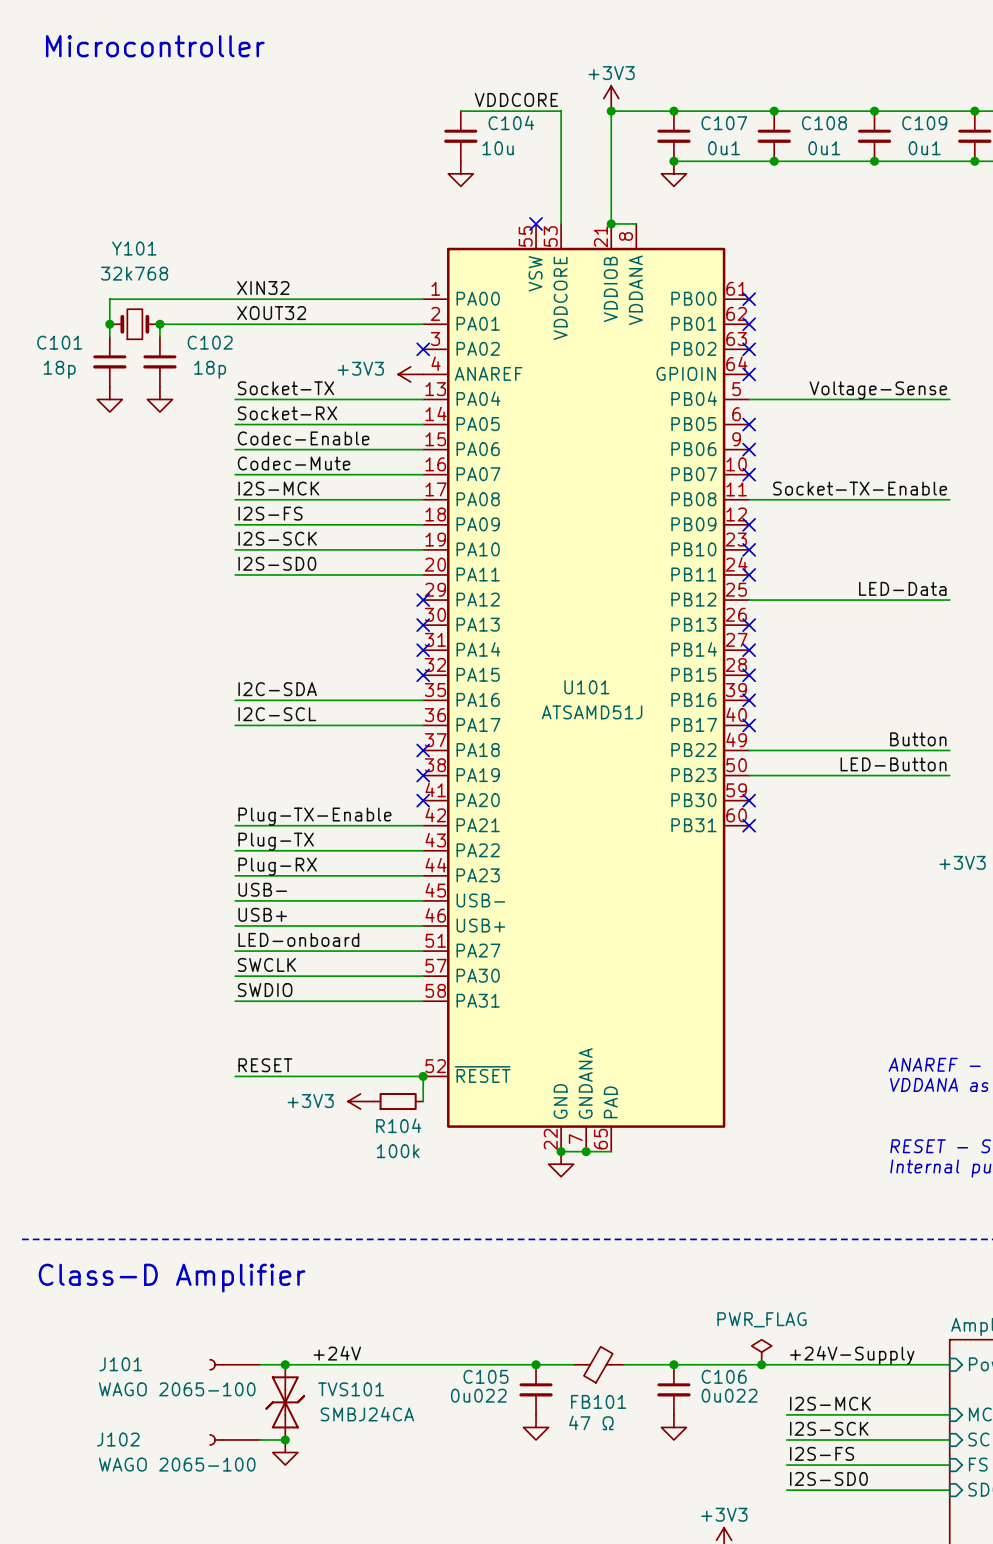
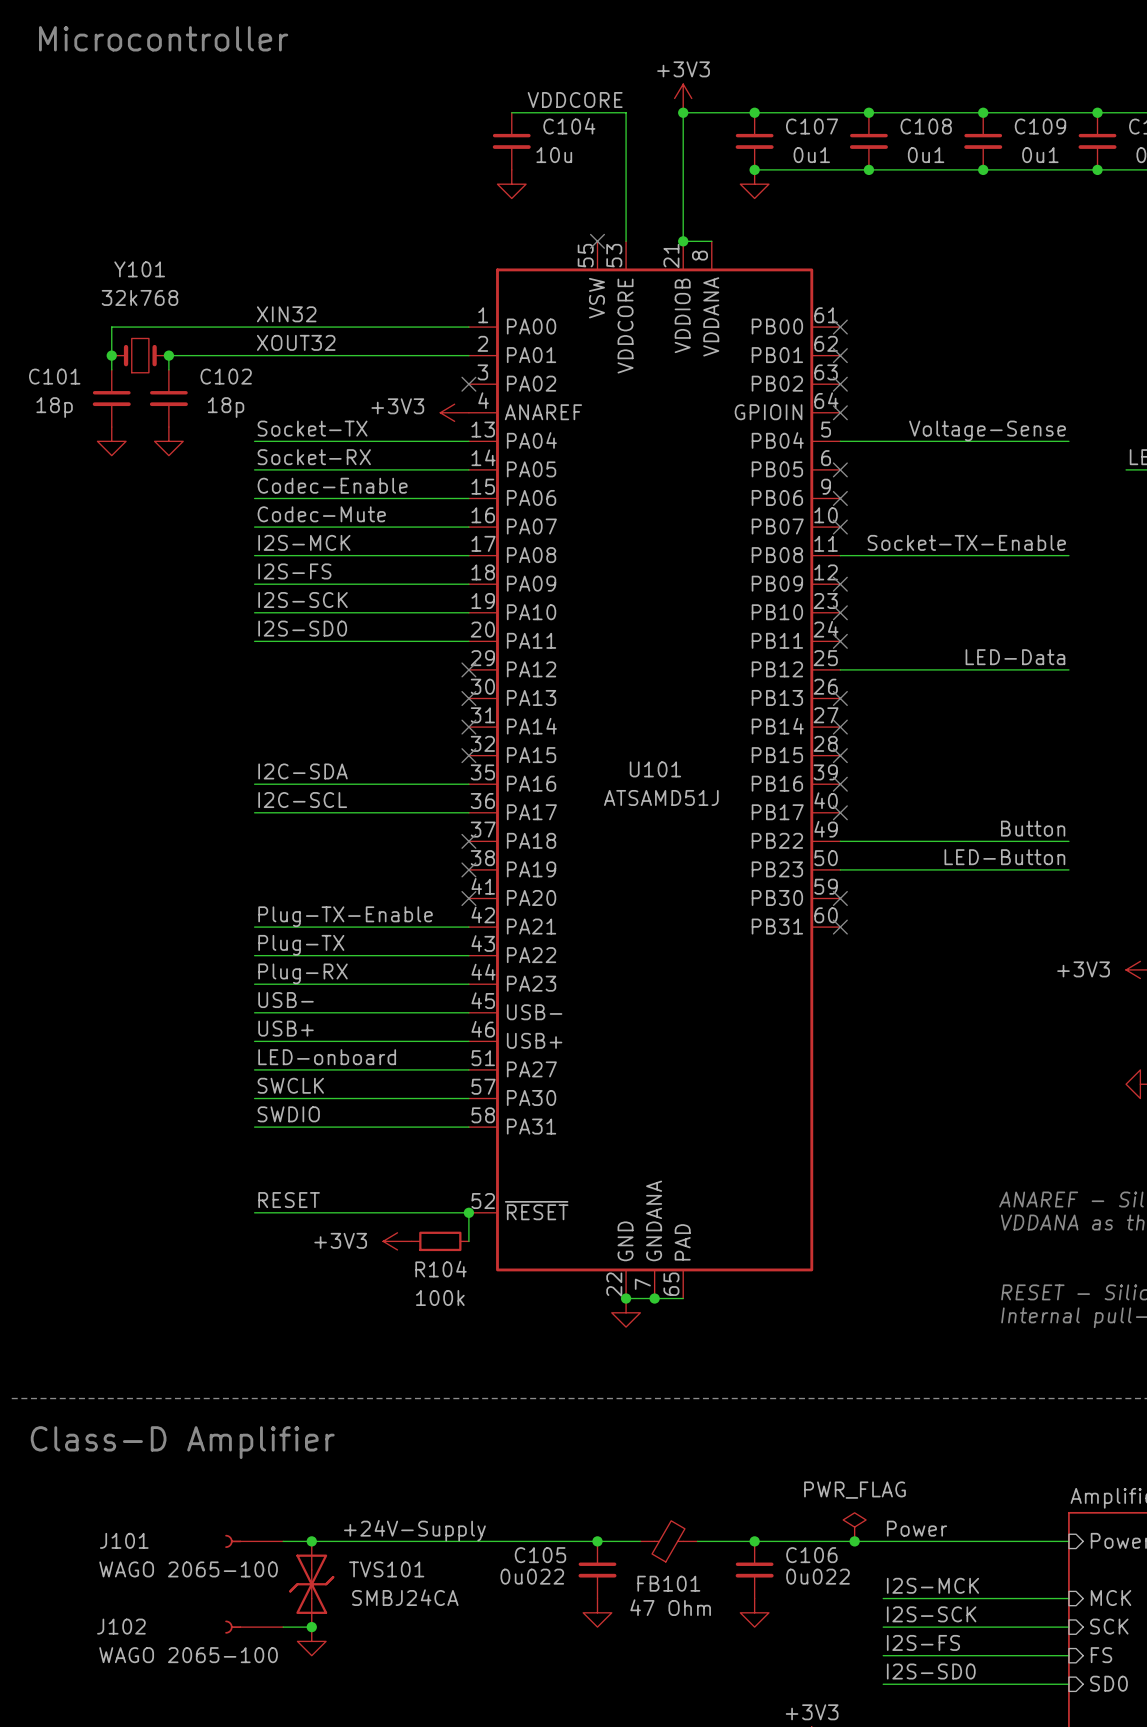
label: +24V (337, 1353) -> +24V-Supply (414, 1530)
label: +24V-Supply (852, 1355) -> Power (917, 1528)
FB101 value: 47 Ω (591, 1422) -> 47 Ohm (670, 1607)

